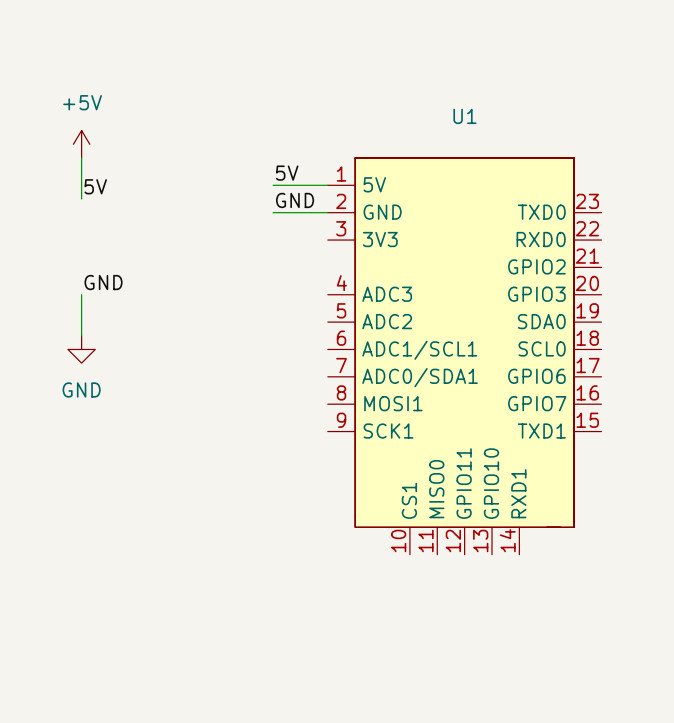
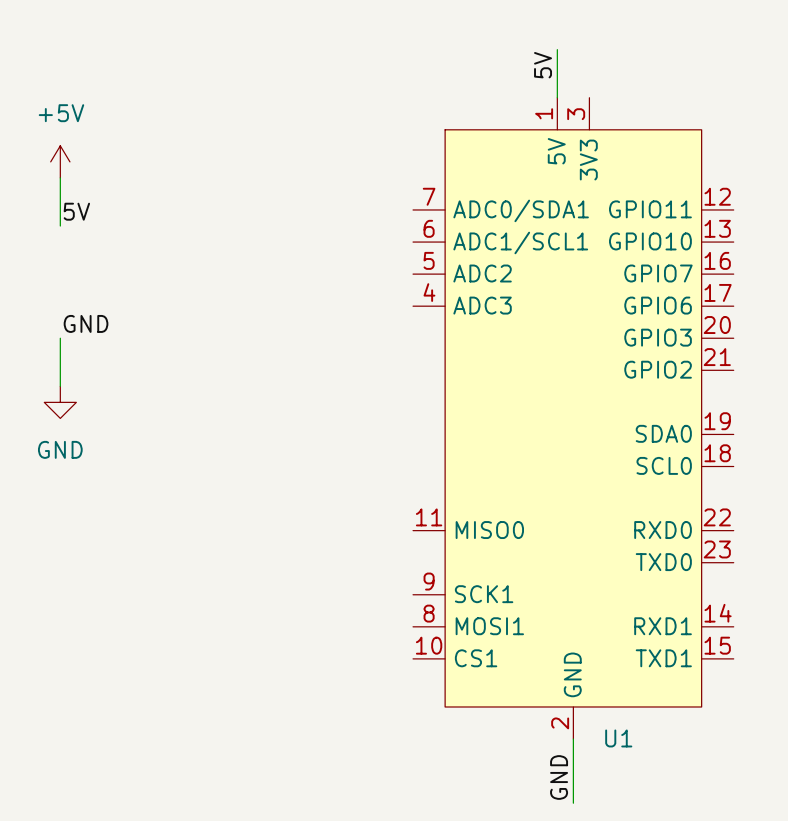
wire: none -> (557, 49) (557, 97)
U1 name position: U1 (464, 116) -> U1 (618, 738)
U1 symbol: [327, 157, 602, 555] -> [413, 97, 734, 740]
label rotation: 0° (287, 173) -> 90° counterclockwise (543, 65)
label position: 5V (287, 173) -> 5V (543, 65)
wire: (273, 185) (327, 185) -> none
label: GND (295, 200) -> none
wire: (273, 212) (327, 212) -> none
wire: none -> (573, 739) (573, 803)
label: none -> GND (559, 777)

